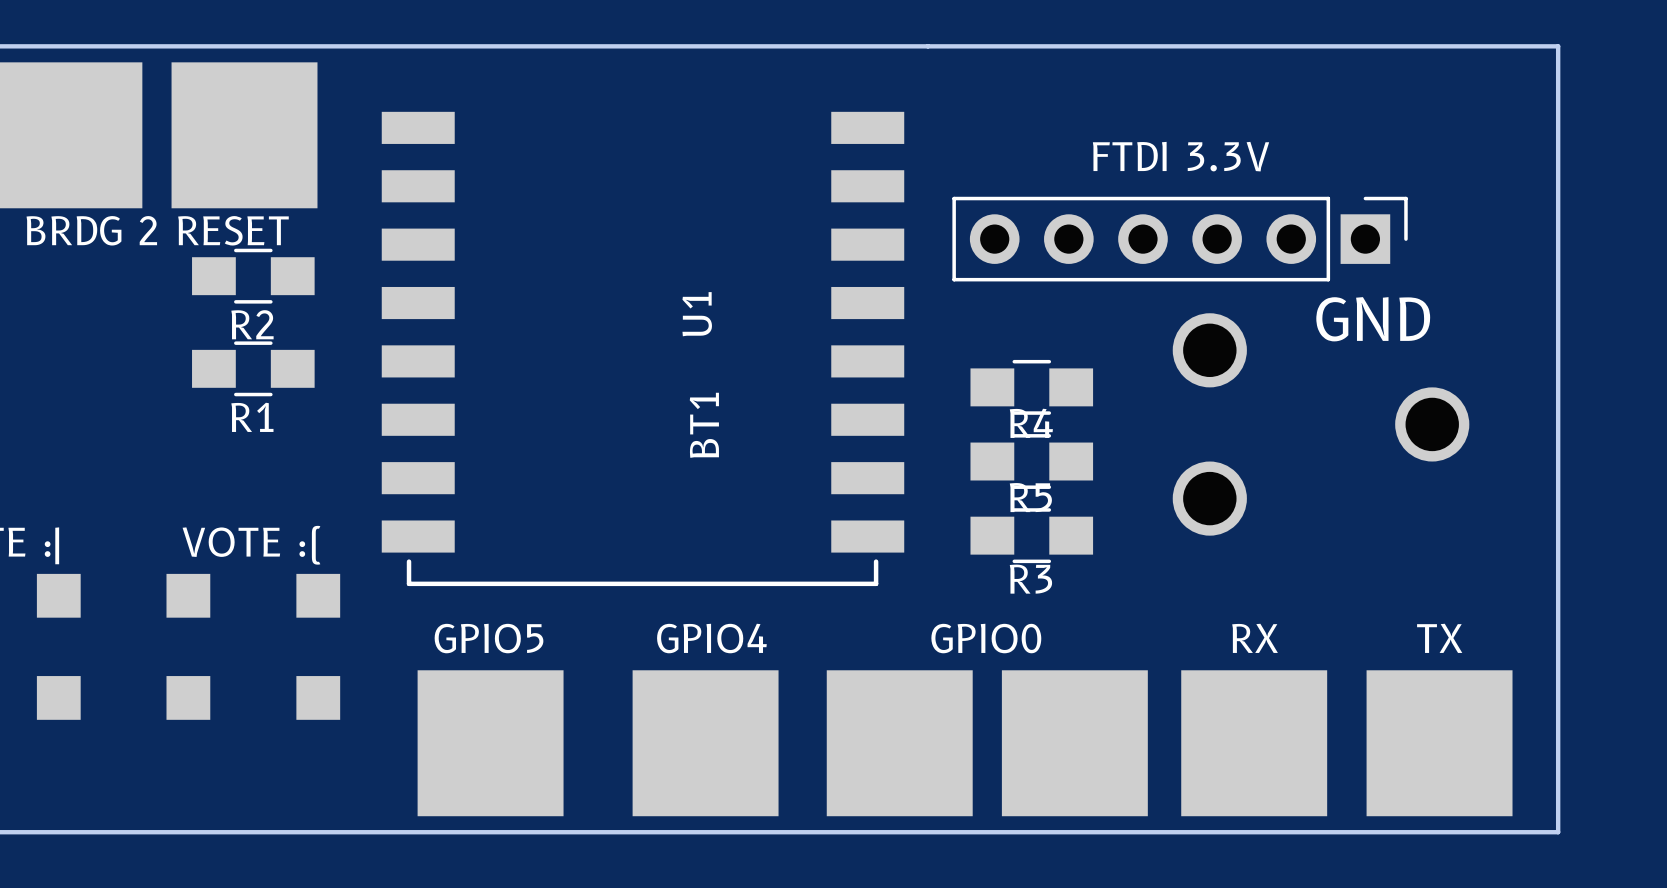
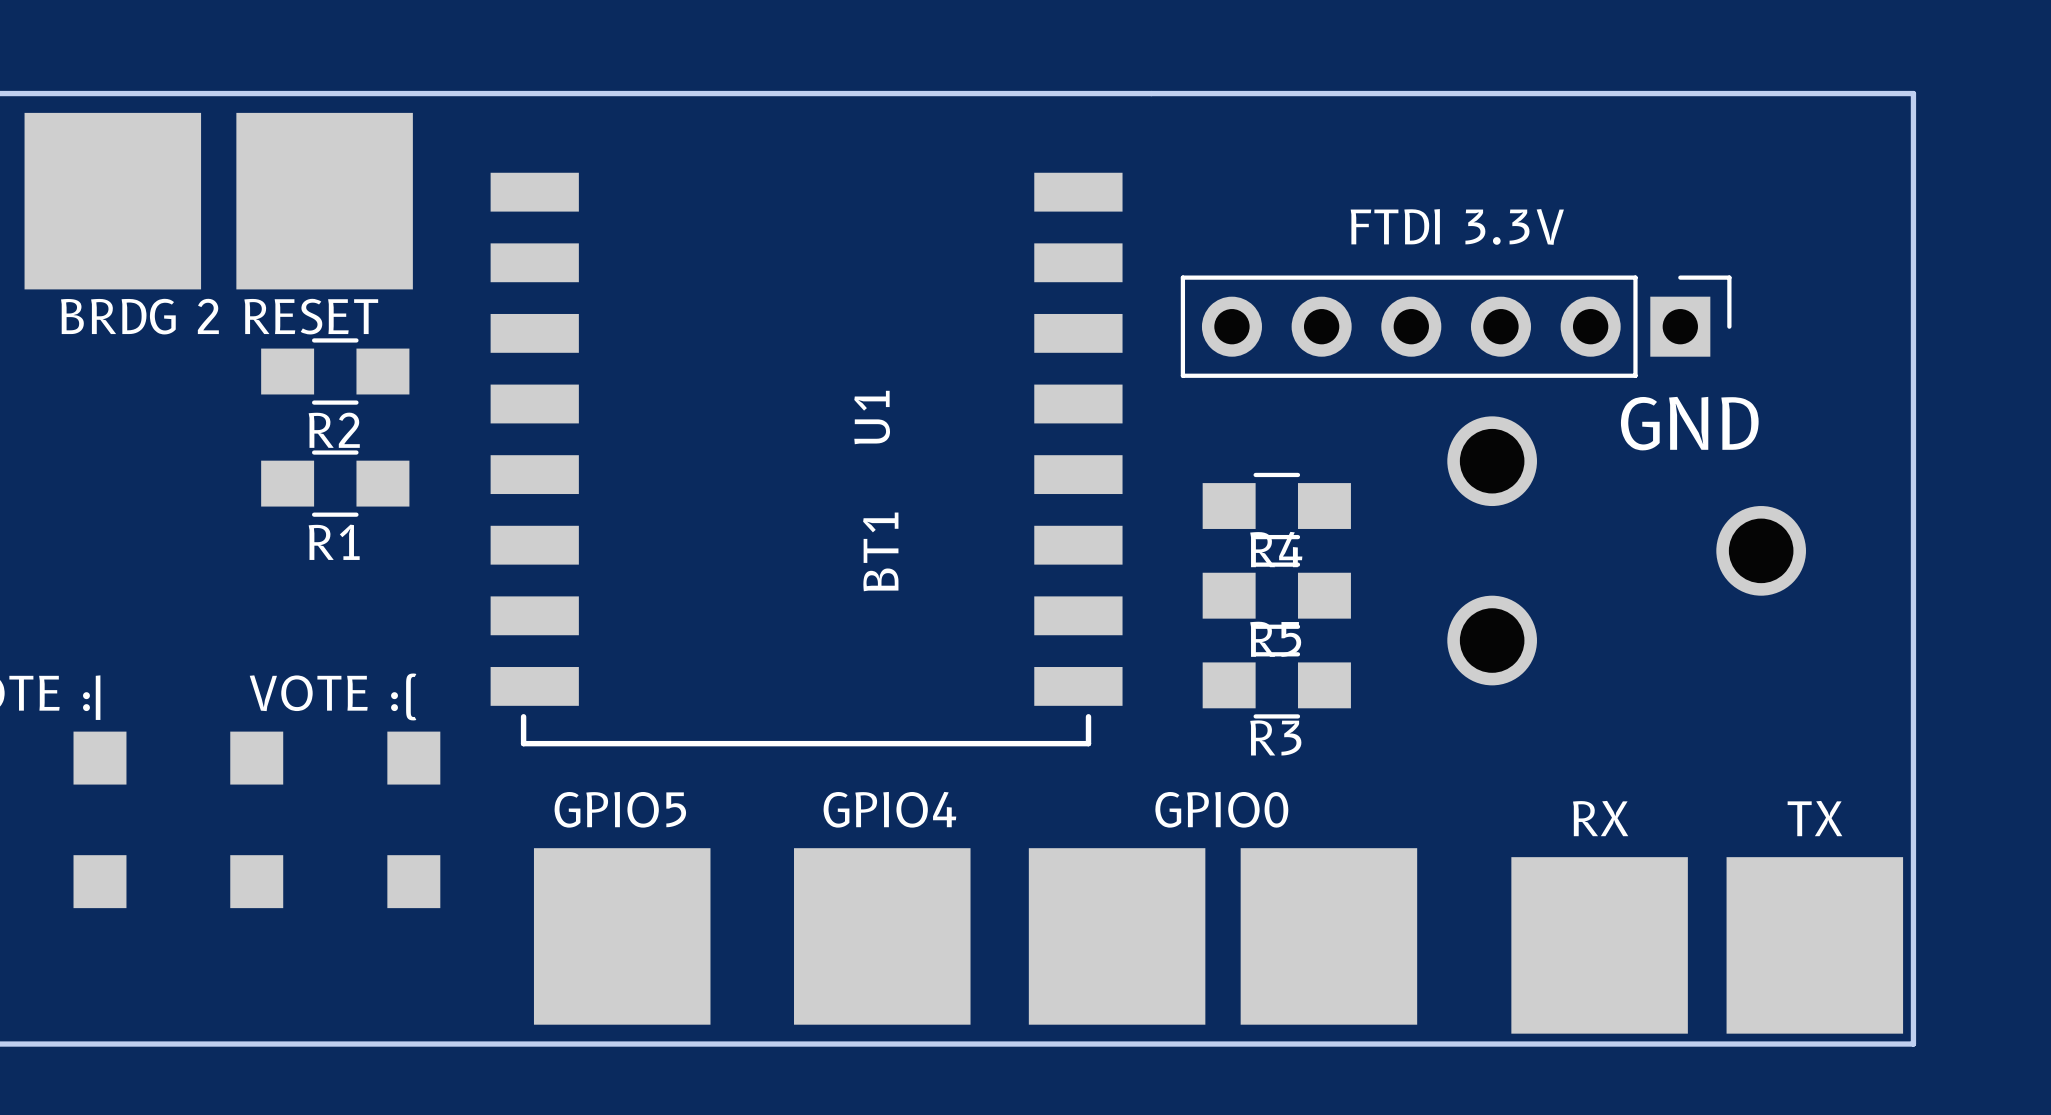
RX position: (1254, 743) -> (1599, 945)
TX position: (1439, 743) -> (1814, 945)

